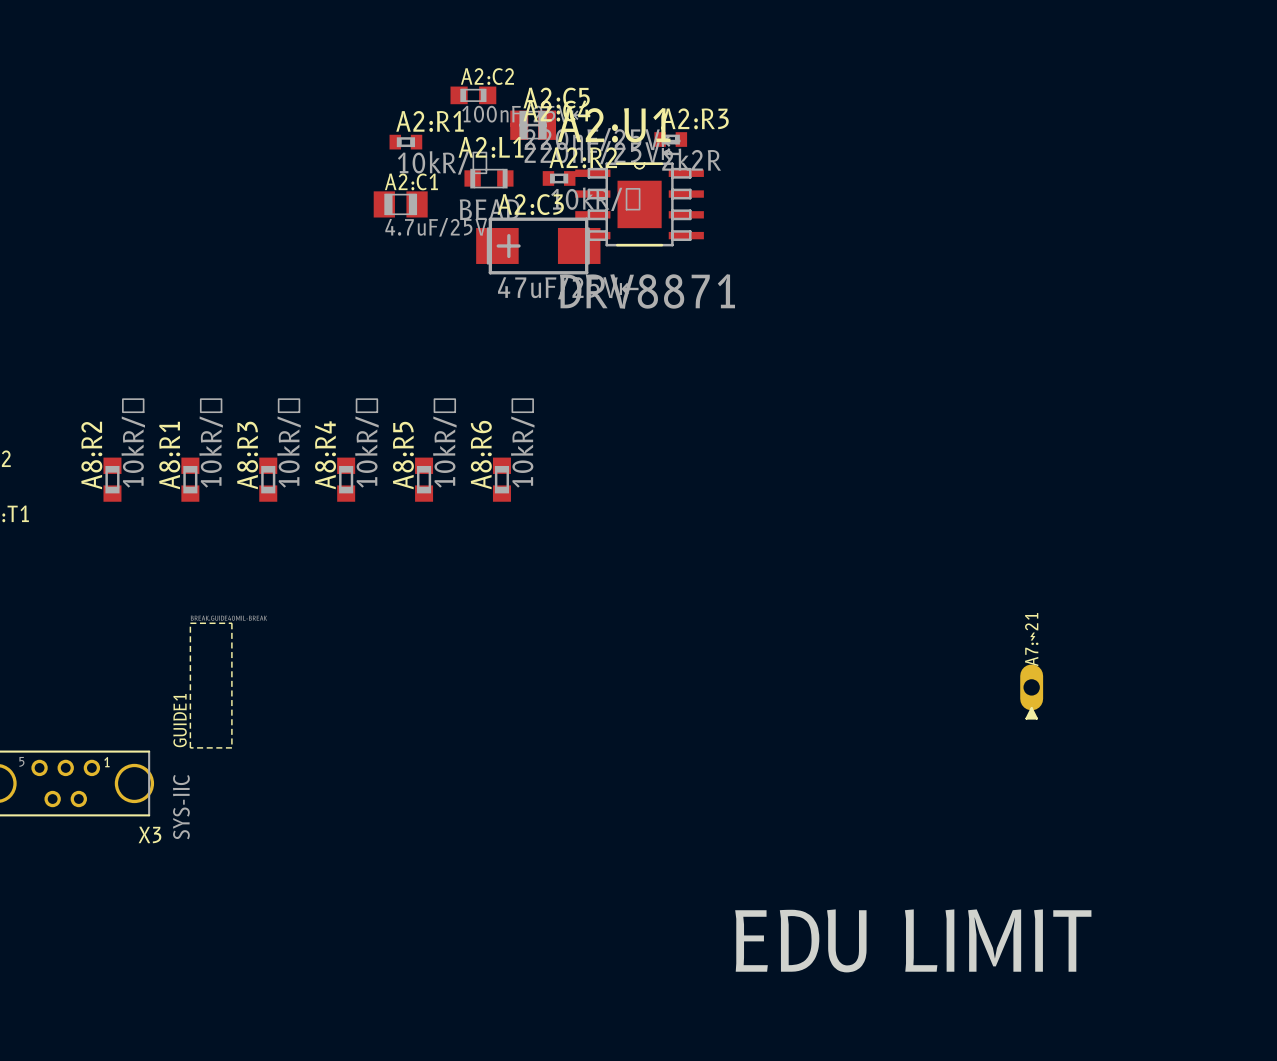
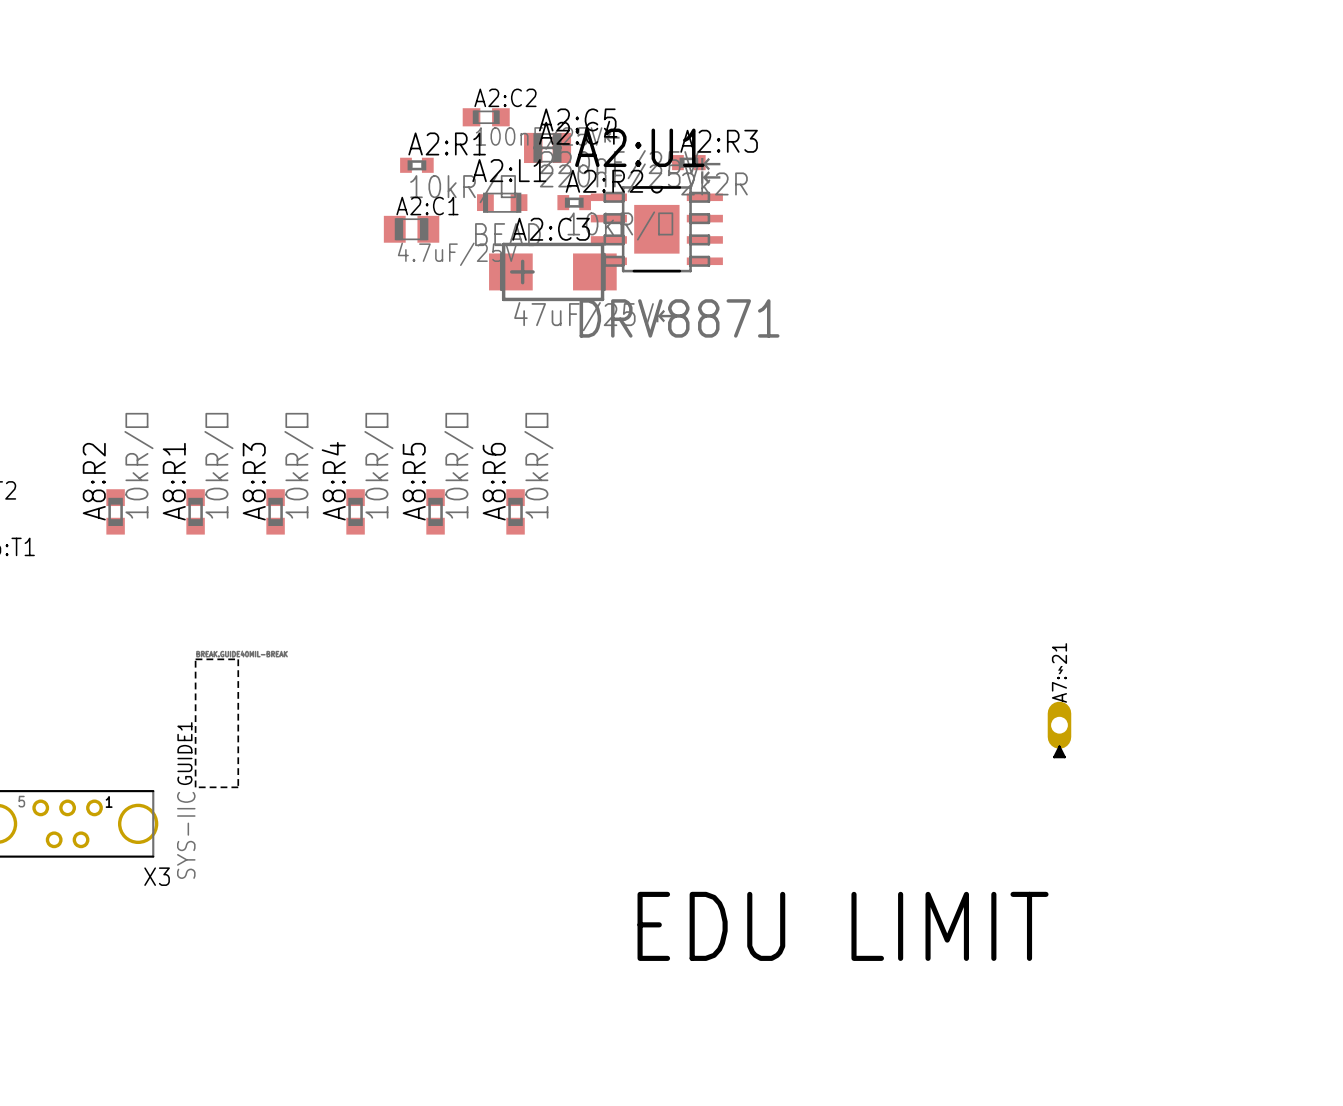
text position: EDU LIMIT (913, 940) -> EDU LIMIT (843, 926)

